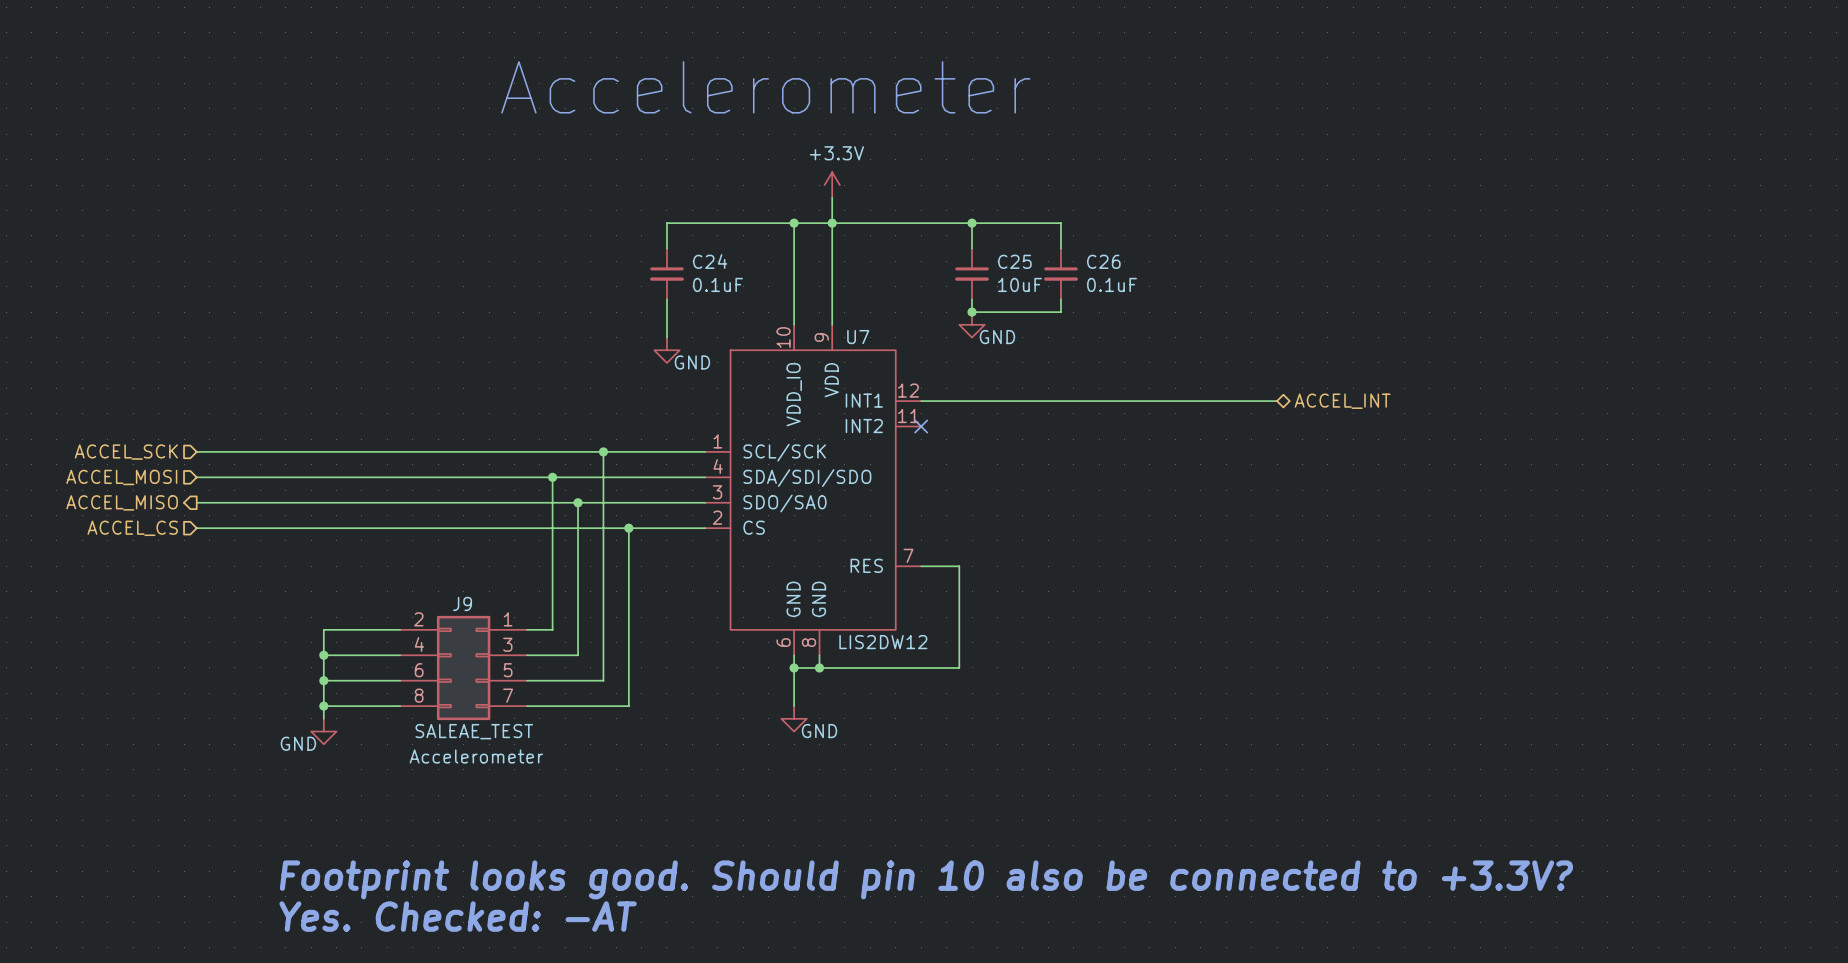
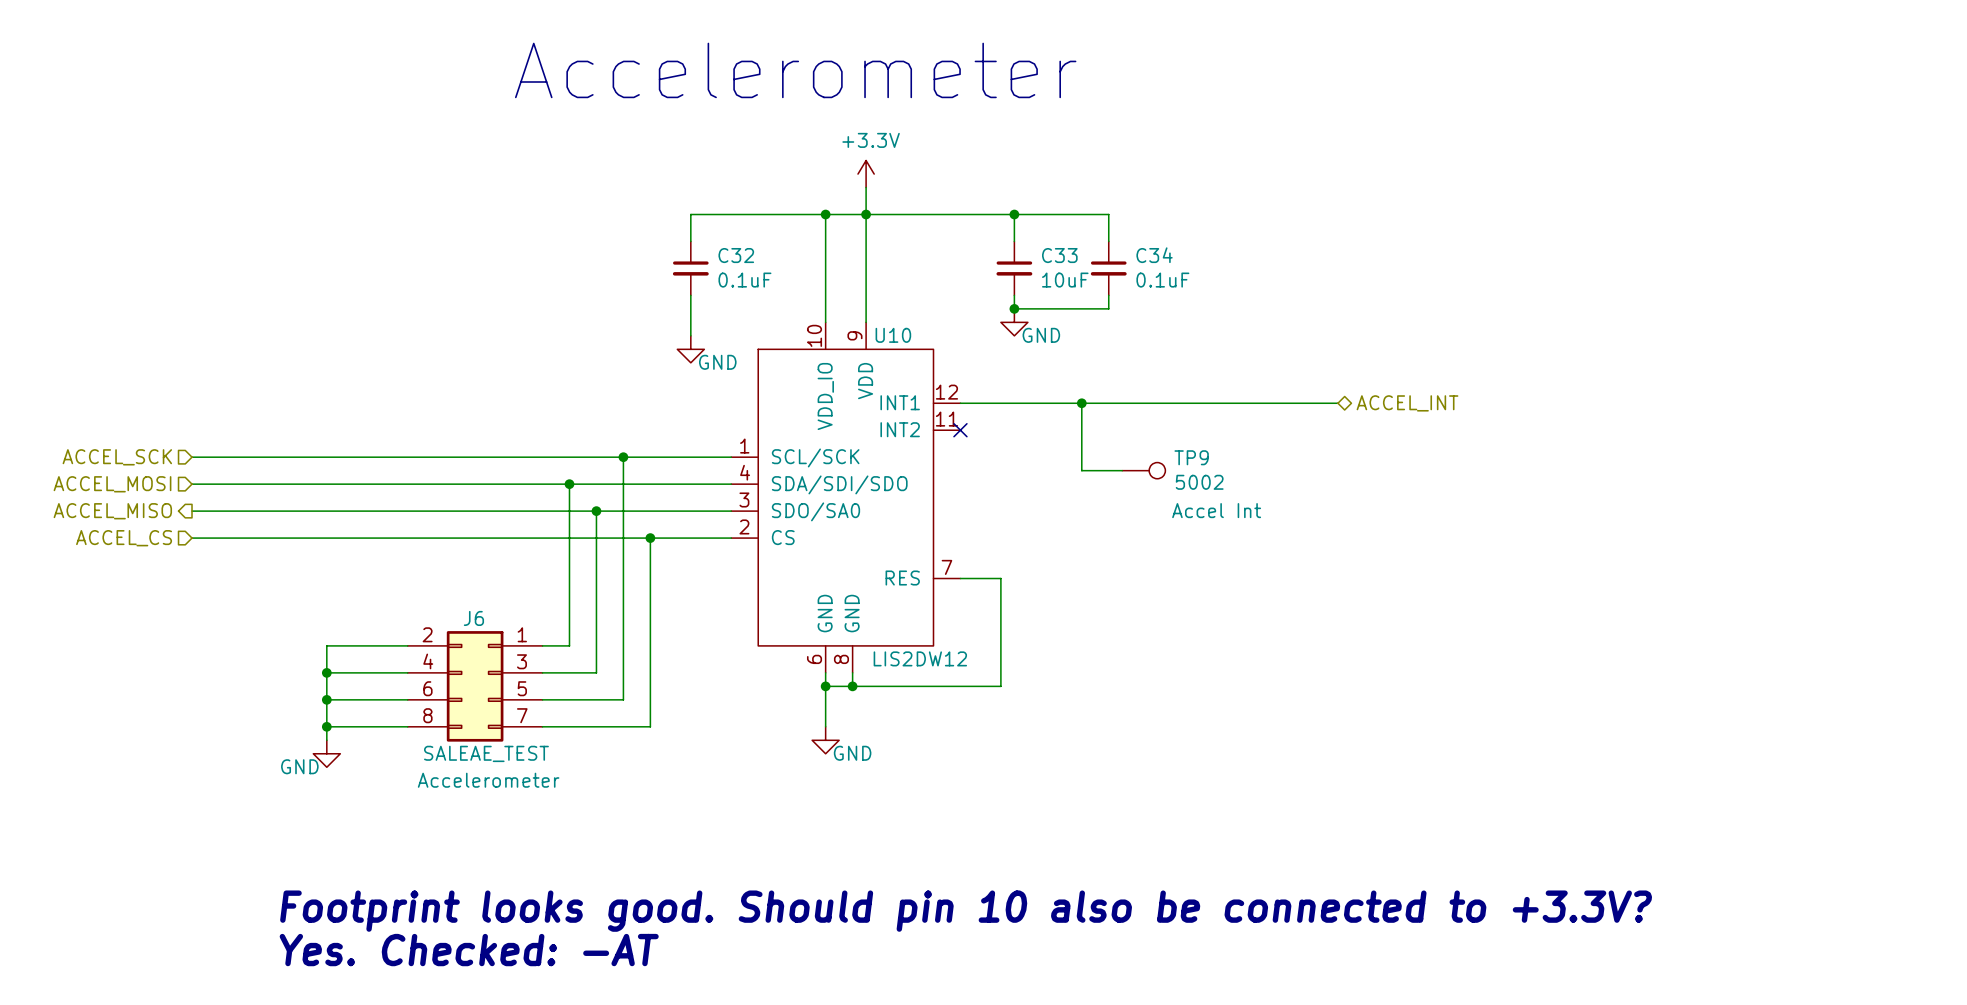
C24 name: C24 (710, 261) -> C32 (736, 255)
C25 name: C25 (1014, 261) -> C33 (1059, 255)
C26 name: C26 (1103, 261) -> C34 (1154, 255)
U7 name: U7 (858, 337) -> U10 (893, 335)
wire: none -> (1081, 403) (1081, 470) (1122, 470)
junction: none -> (1081, 403)
TP9: none -> 5002 (1143, 470)
J9 name: J9 (462, 603) -> J6 (473, 618)

